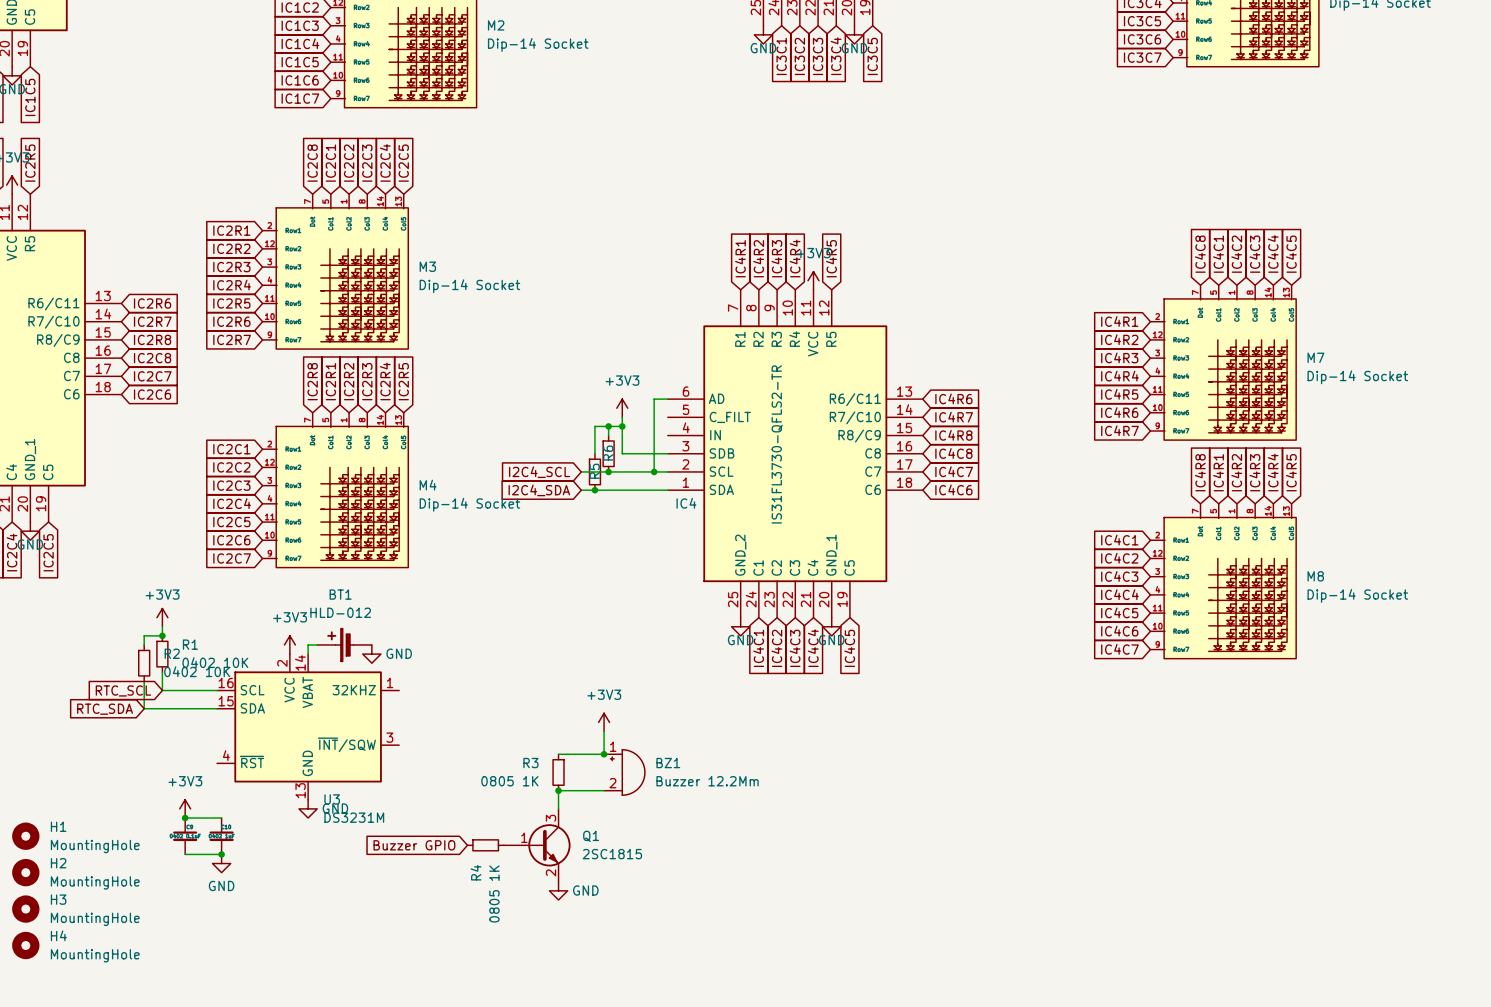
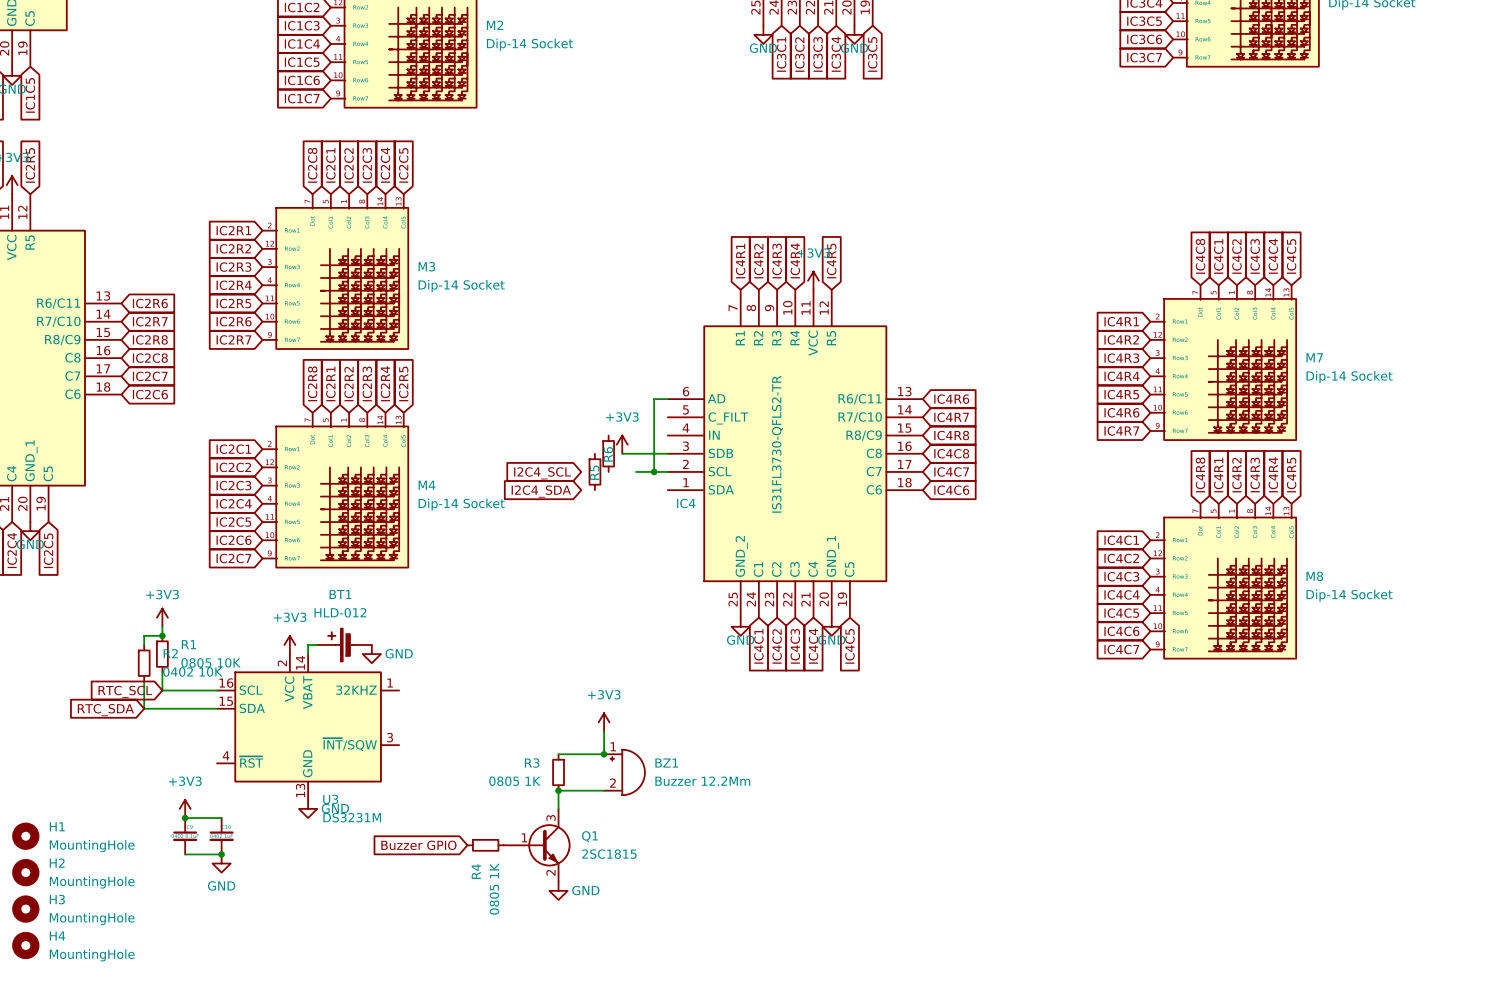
power symbol position: +3V3 (622, 408) -> +3V3 (622, 444)
wire: (608, 426) (608, 435) -> none
junction: (608, 426) -> none
wire: (622, 426) (594, 426) (594, 453) -> none
junction: (622, 426) -> none
wire: (581, 471) (635, 471) -> none
junction: (608, 471) -> none
wire: (581, 490) (667, 490) -> none
junction: (594, 490) -> none
R1 value: 0402 10K (215, 662) -> 0805 10K (211, 662)

